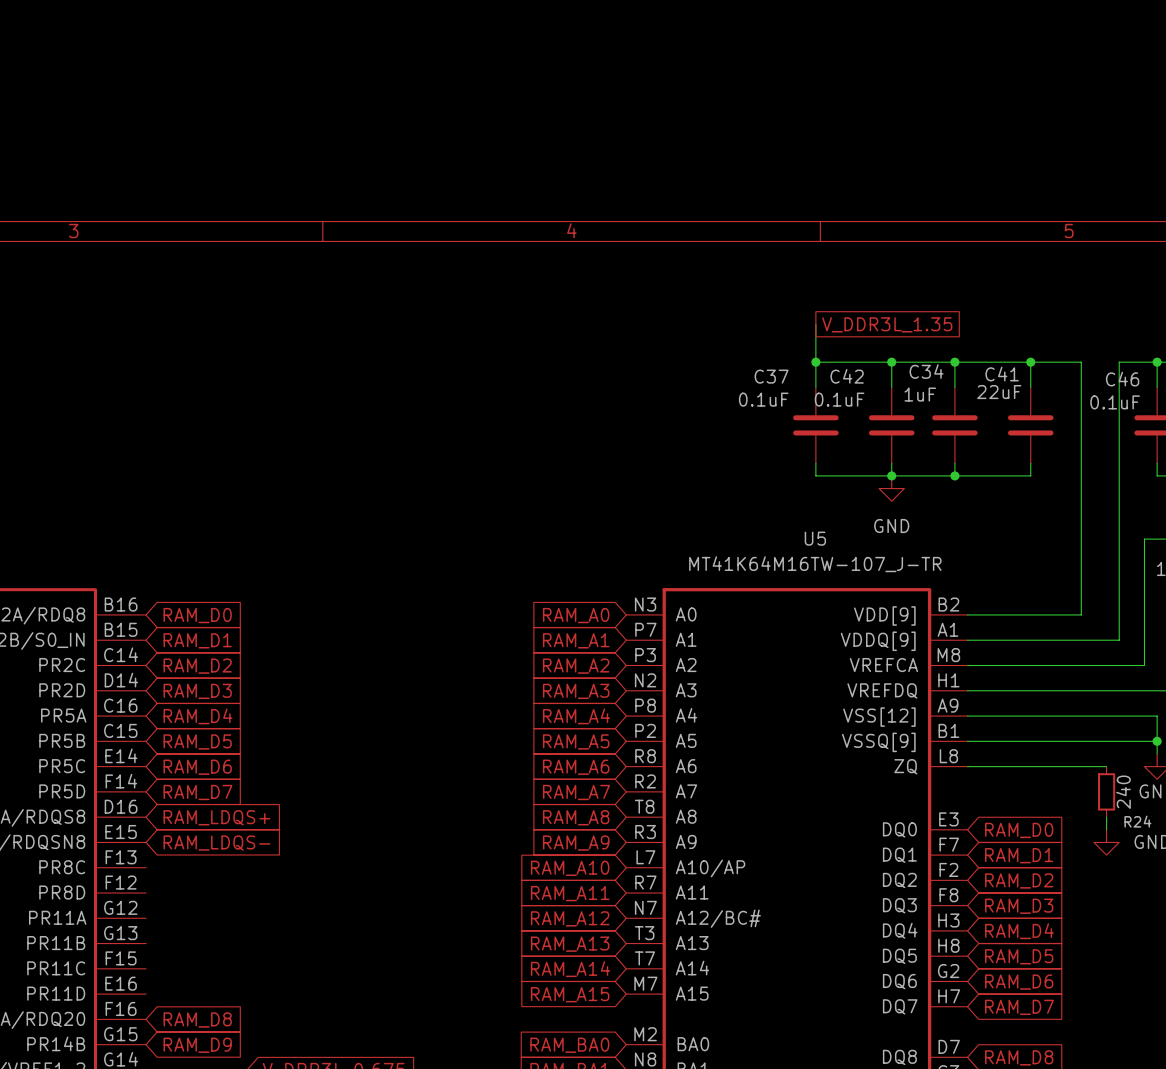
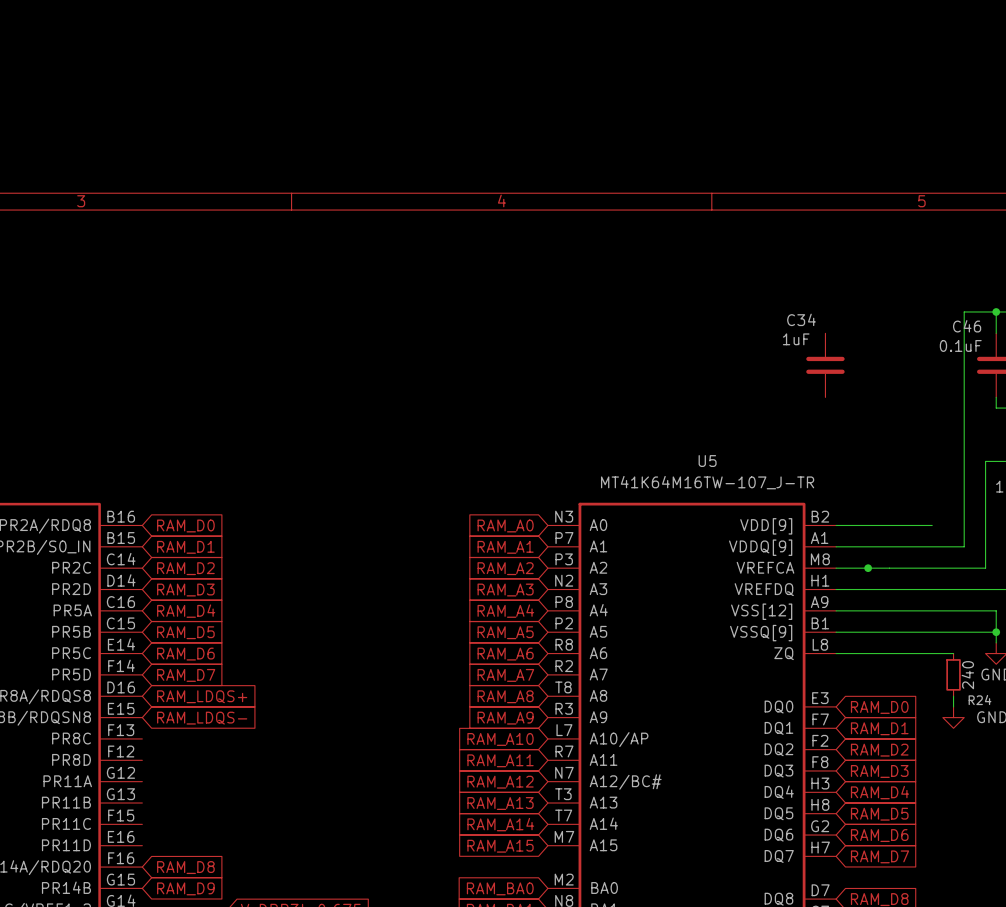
wire: (815, 324) (815, 387) -> none
global label: V_DDR3L_1.35 (887, 324) -> none
wire: (815, 362) (1081, 362) (1081, 614) -> none
junction: (815, 362) -> none
wire: (891, 362) (891, 387) -> none
junction: (891, 362) -> none
wire: (954, 362) (954, 387) -> none
junction: (954, 362) -> none
wire: (1030, 362) (1030, 387) -> none
junction: (1030, 362) -> none
C37: 0.1uF (815, 425) -> none
C42: 0.1uF (891, 425) -> none
C41: 22uF (1030, 425) -> none
wire: (815, 463) (815, 475) (1030, 475) (1030, 463) -> none
wire: (891, 463) (891, 475) -> none
wire: (954, 463) (954, 475) -> none
junction: (891, 475) -> none
junction: (954, 475) -> none
power symbol: GND (891, 488) -> none
junction: none -> (868, 568)

